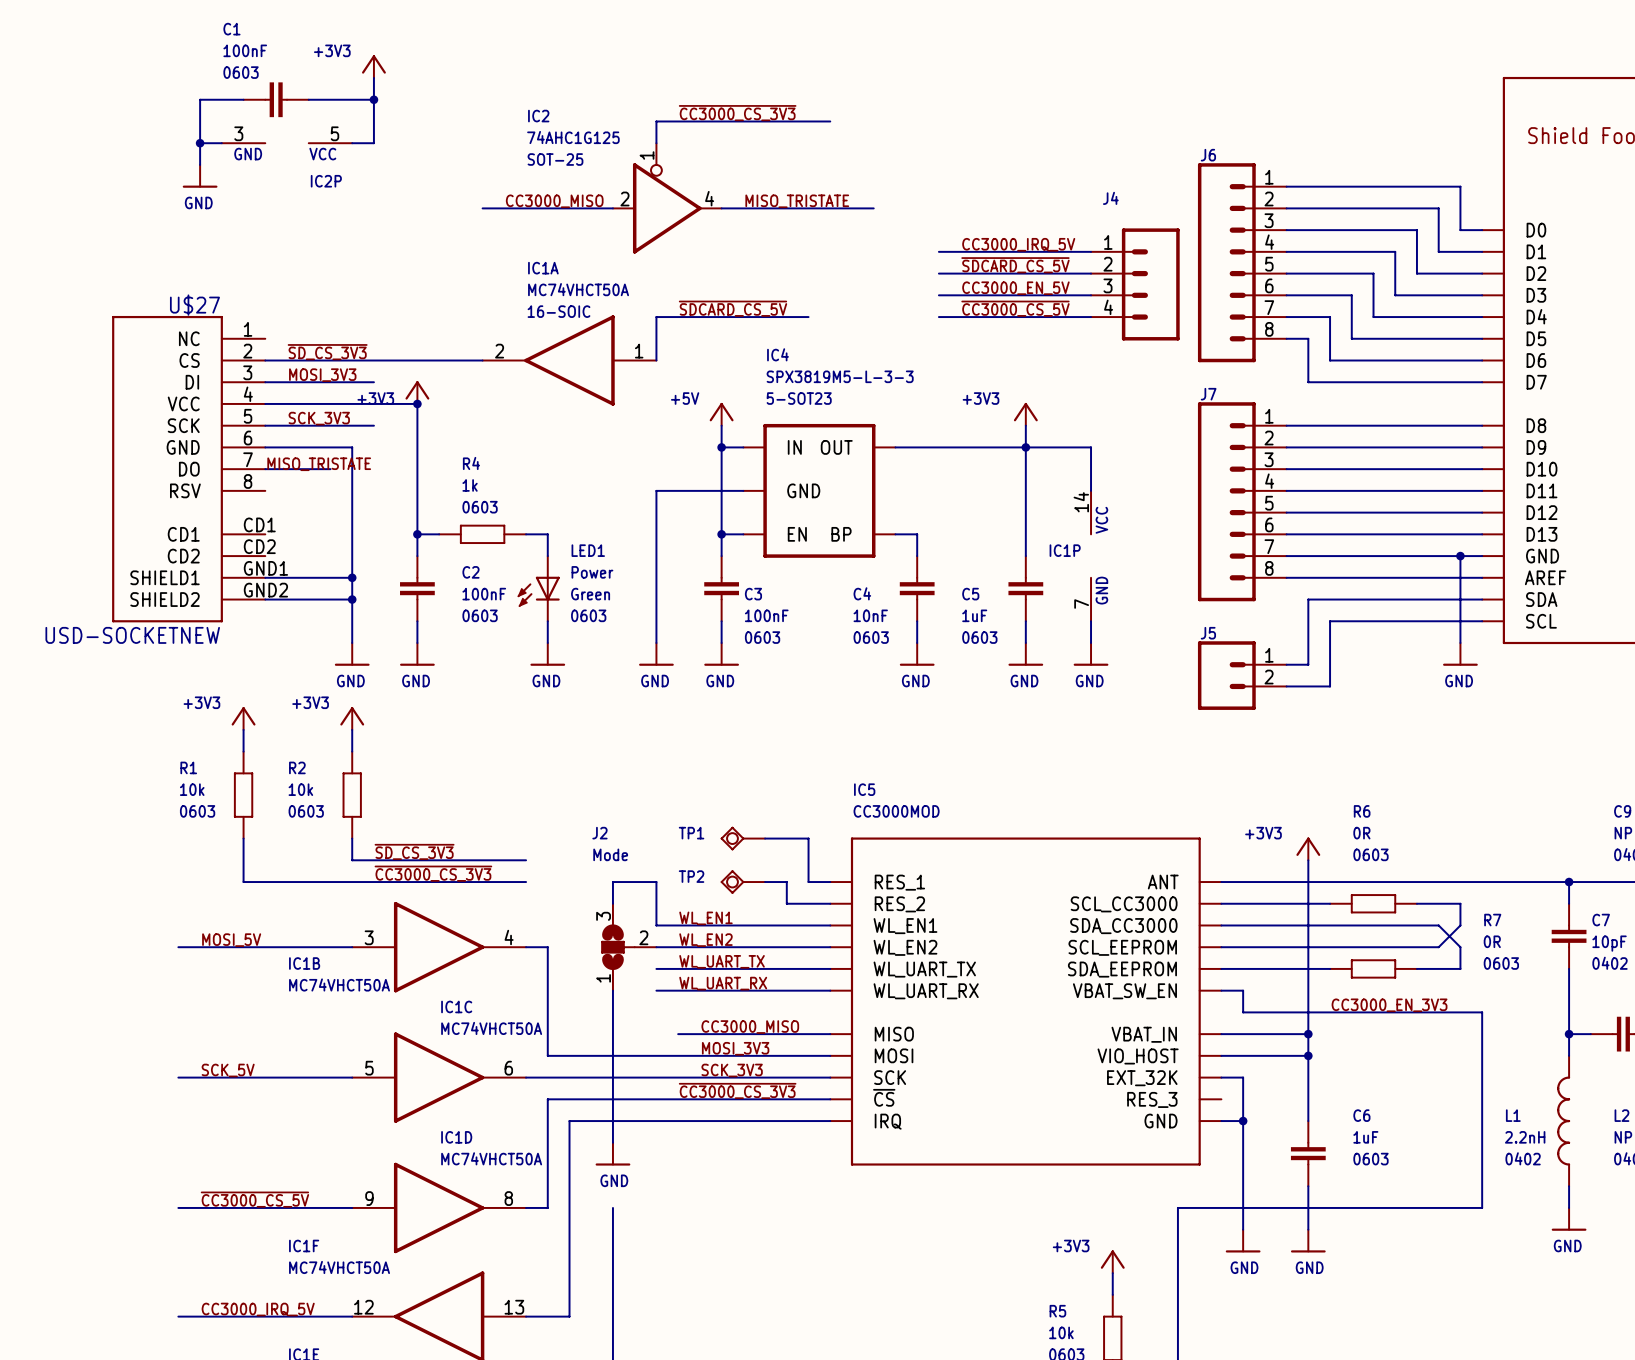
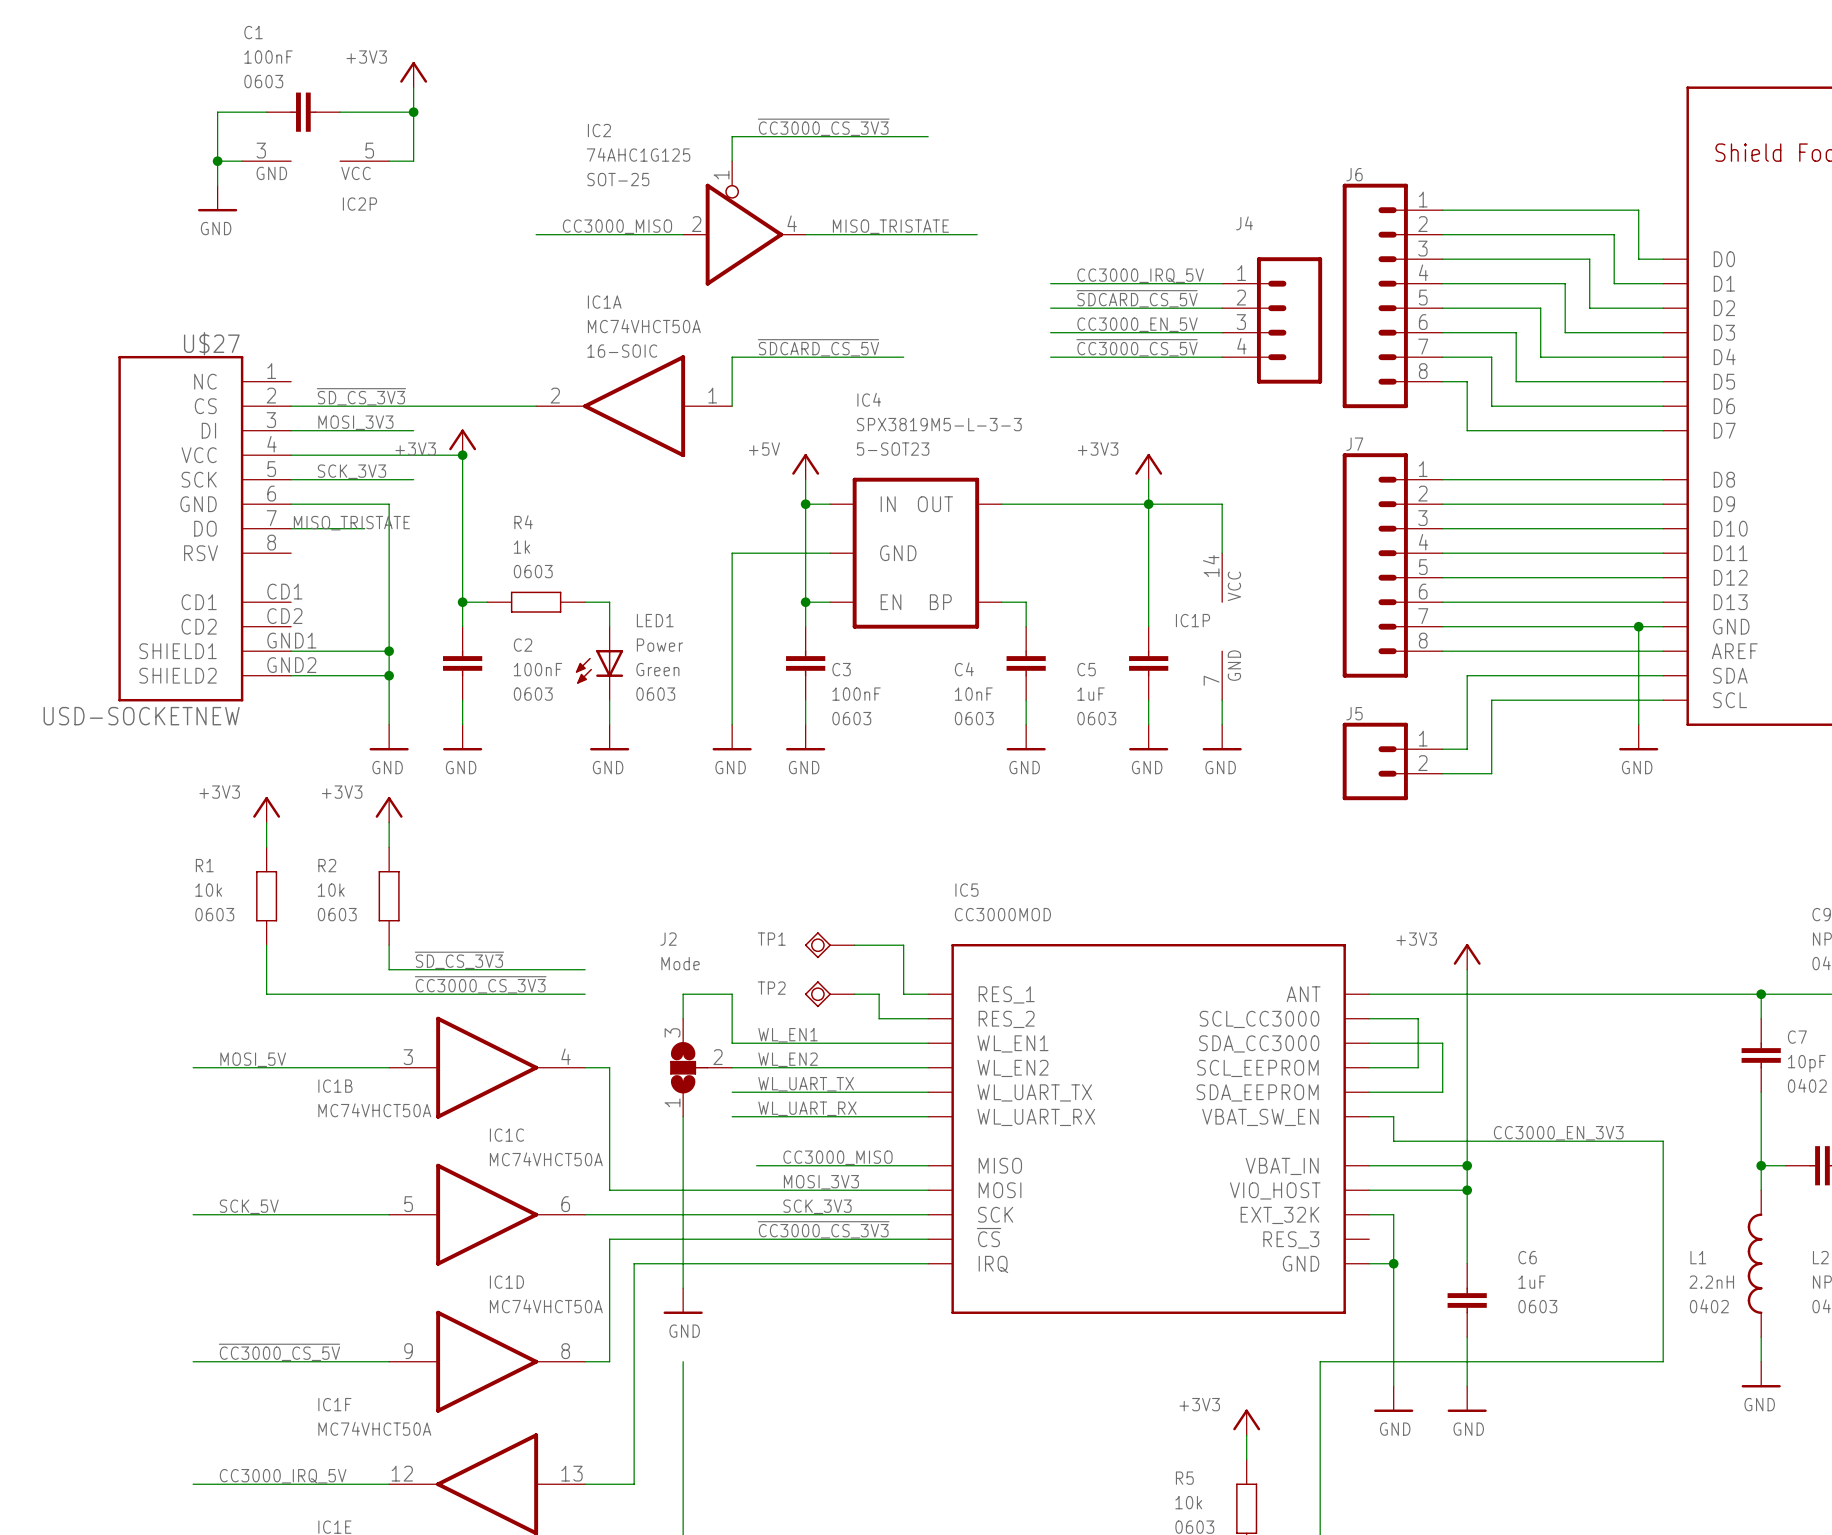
wire: (1264, 903) (1330, 903) -> (1418, 1018) (1418, 1067)
R6: 0R (1373, 903) -> none
wire: (1416, 903) (1460, 903) (1460, 925) (1438, 947) (1264, 947) -> none
wire: (1286, 925) (1438, 925) (1460, 947) (1460, 968) (1416, 968) -> none
wire: (1286, 968) (1330, 968) -> (1442, 1092) (1442, 1043)
R7: 0R (1373, 968) -> none

